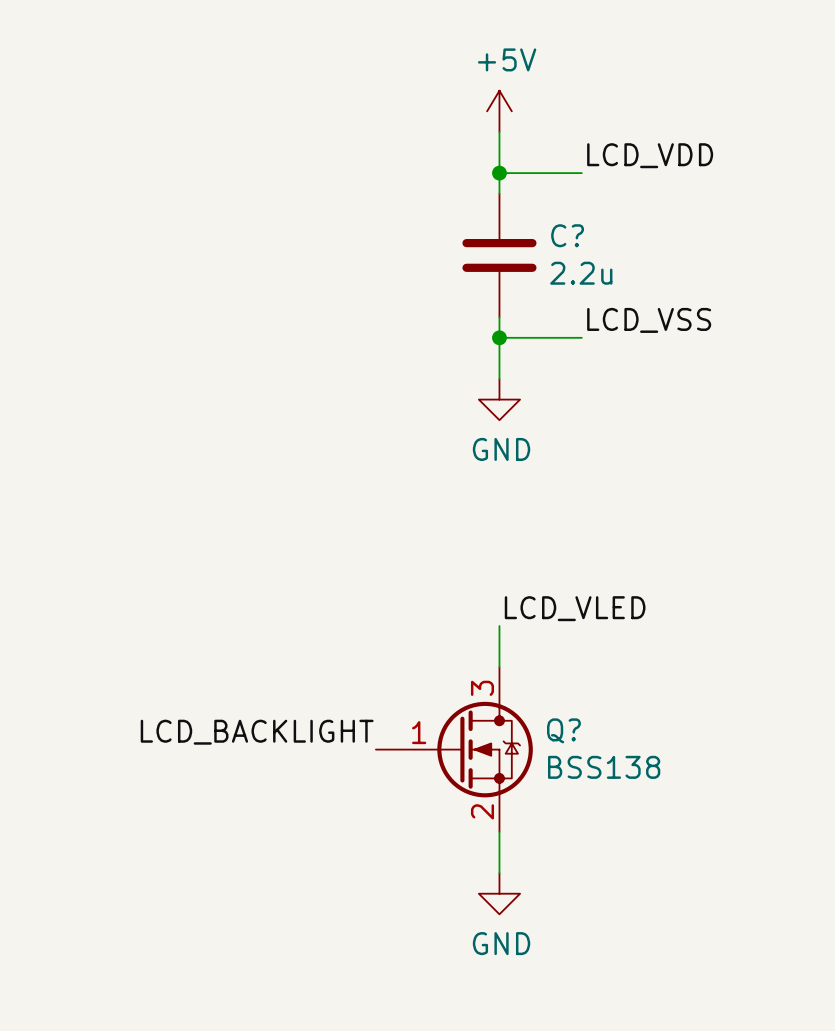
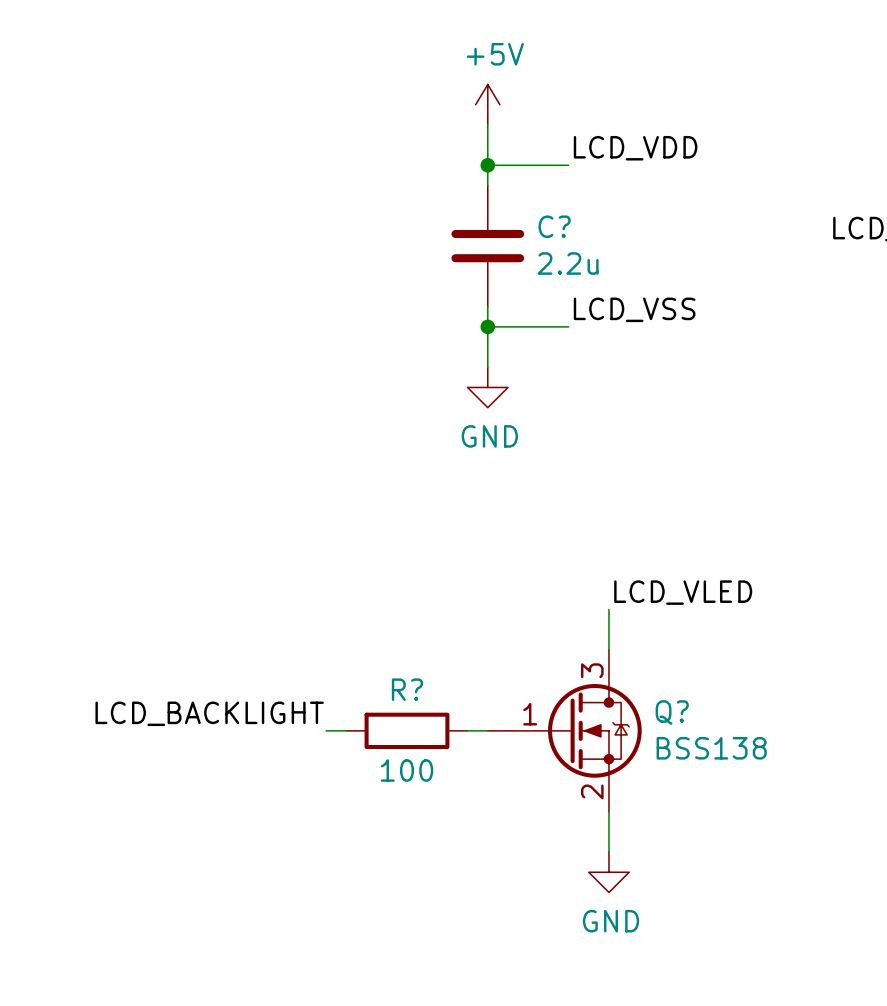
label position: LCD_VLED (575, 608) -> LCD_VLED (683, 592)
wire: (499, 626) (499, 667) -> (608, 609) (608, 650)
label position: LCD_BACKLIGHT (257, 732) -> LCD_BACKLIGHT (209, 713)
wire: none -> (326, 730) (346, 730)
R?: none -> 100 (406, 730)
Q? position: (454, 749) -> (564, 730)
wire: (499, 831) (499, 873) -> (608, 811) (608, 852)
power symbol position: GND (499, 893) -> GND (608, 872)

